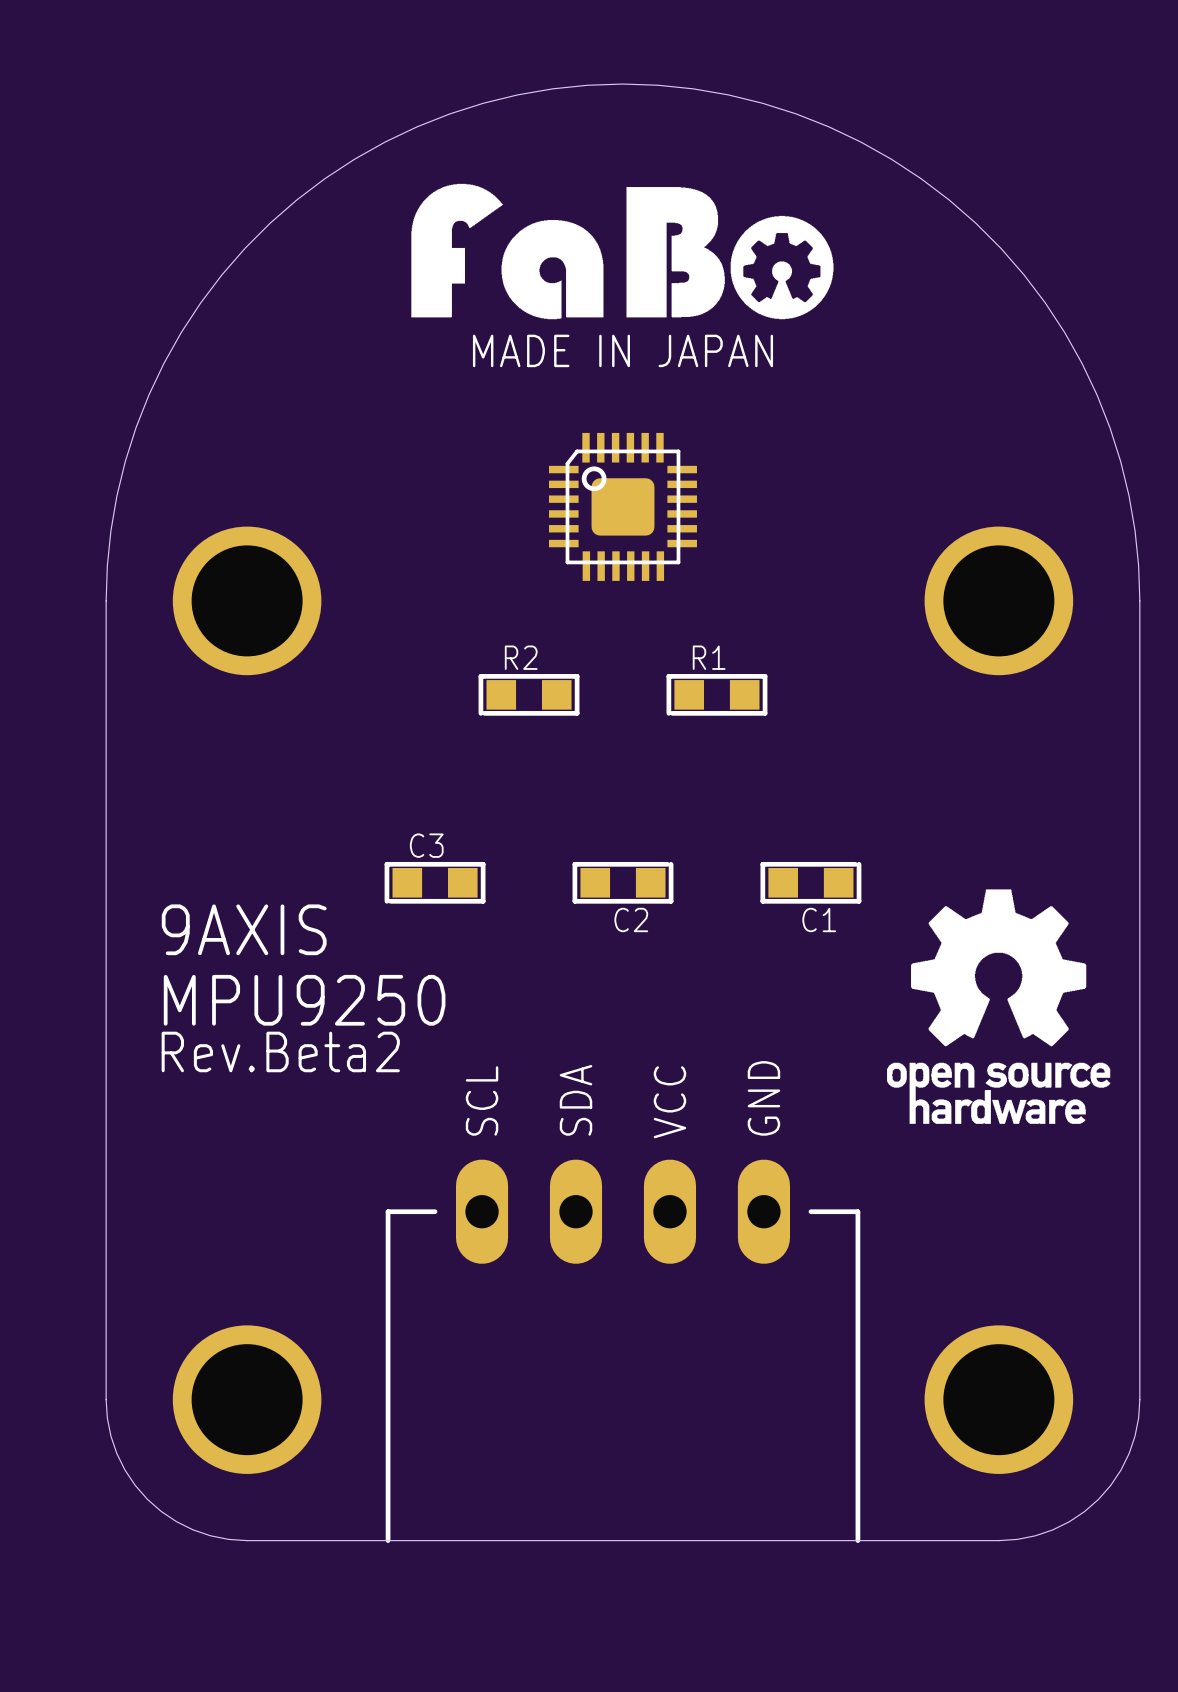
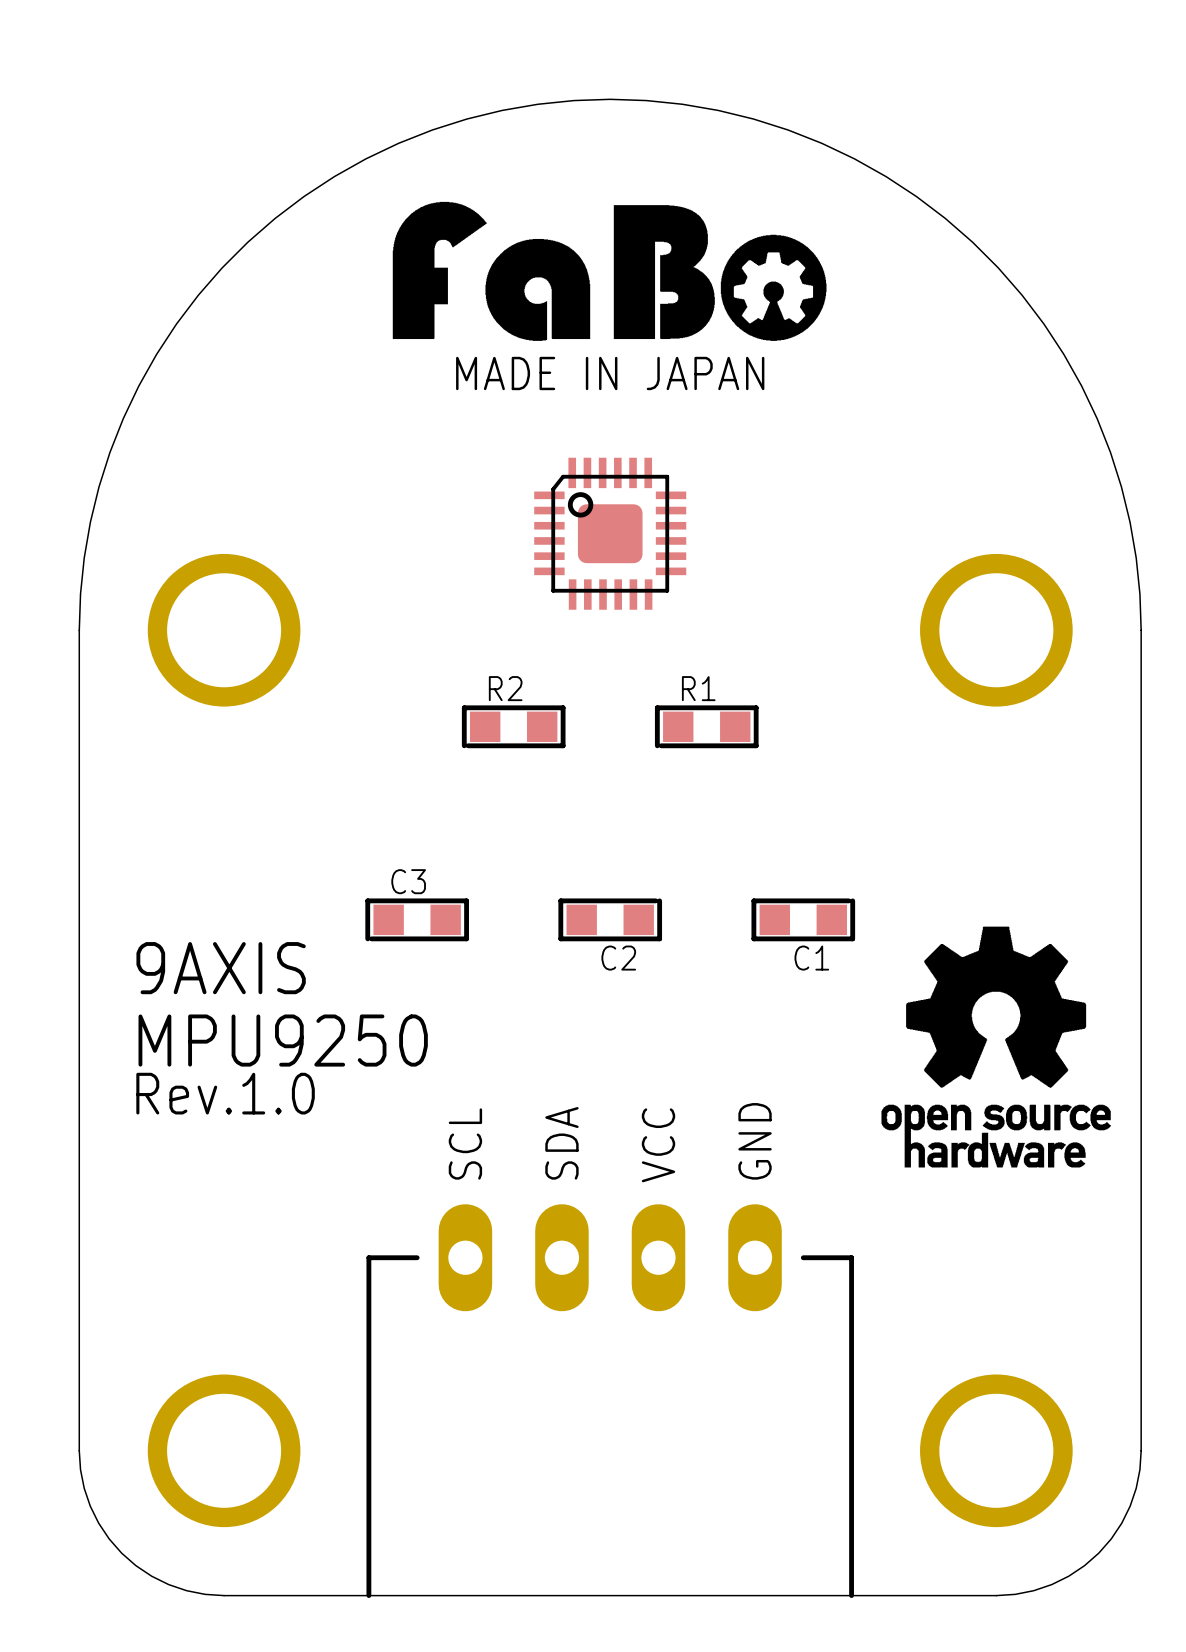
text: Rev.Beta2 (280, 1051) -> Rev.1.0 (225, 1093)

